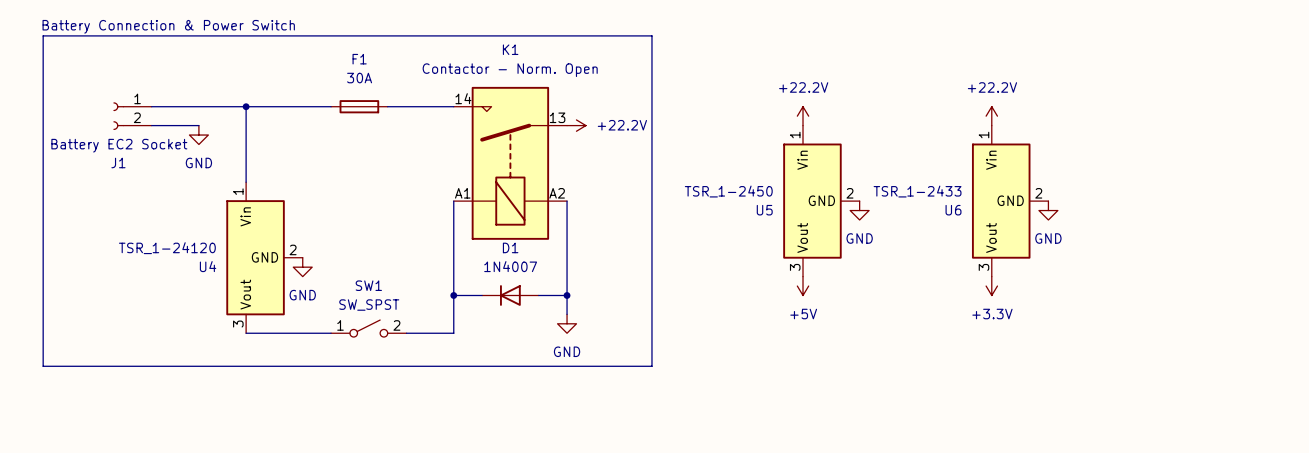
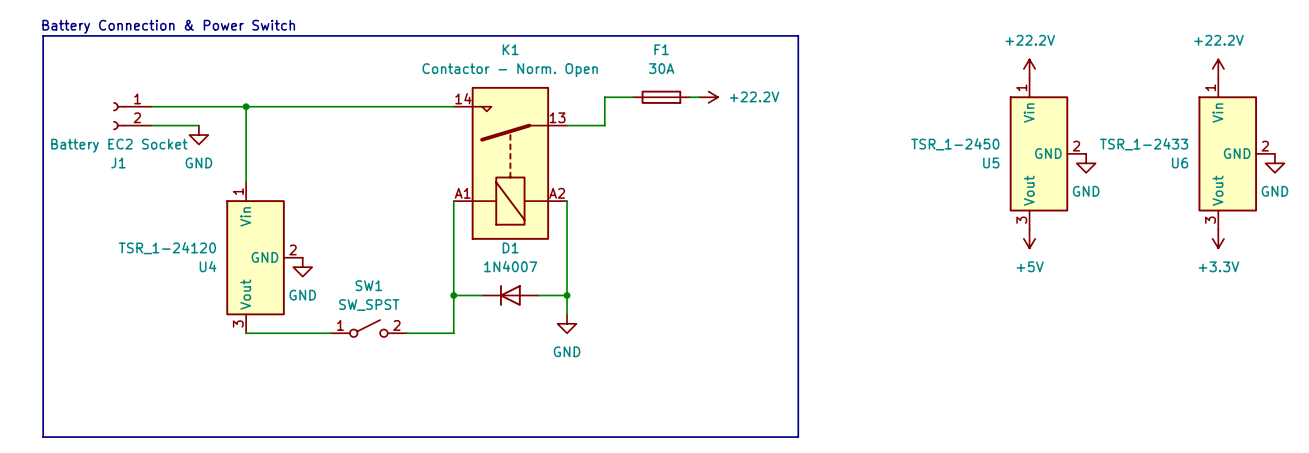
line: (651, 35) (651, 366) (43, 366) -> (651, 35) (798, 35) (798, 437) (43, 437) (43, 366)
power symbol: none -> +22.2V (1218, 68)
wire: none -> (633, 97) (604, 97) (604, 125) (567, 125)
wire: none -> (689, 97) (699, 97)
power symbol: none -> +22.2V (708, 97)
F1 position: (359, 106) -> (661, 97)
power symbol: +22.2V (803, 116) -> none
power symbol position: +22.2V (991, 116) -> +22.2V (1029, 68)
power symbol: +22.2V (576, 125) -> none
power symbol: none -> GND (1274, 163)
U5 position: (821, 201) -> (1047, 153)
U6 position: (1010, 201) -> (1236, 153)
power symbol: GND (859, 210) -> none
power symbol position: GND (1048, 210) -> GND (1086, 163)
power symbol: none -> +5V (1029, 238)
power symbol: none -> +3.3V (1218, 238)
power symbol: +5V (803, 286) -> none
power symbol: +3.3V (991, 286) -> none

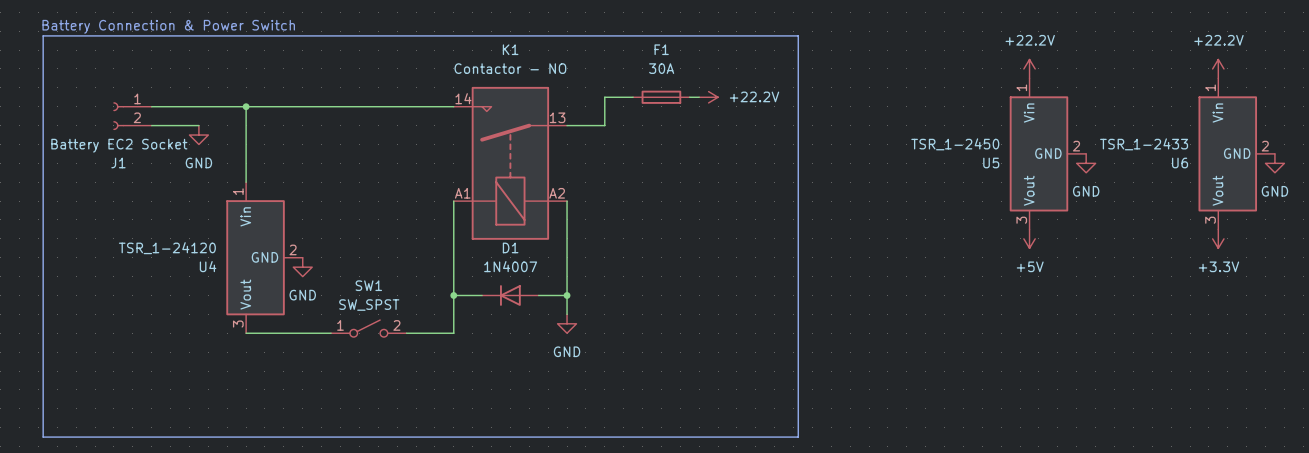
K1 value: Contactor - Norm. Open (510, 70) -> Contactor - NO (510, 68)

